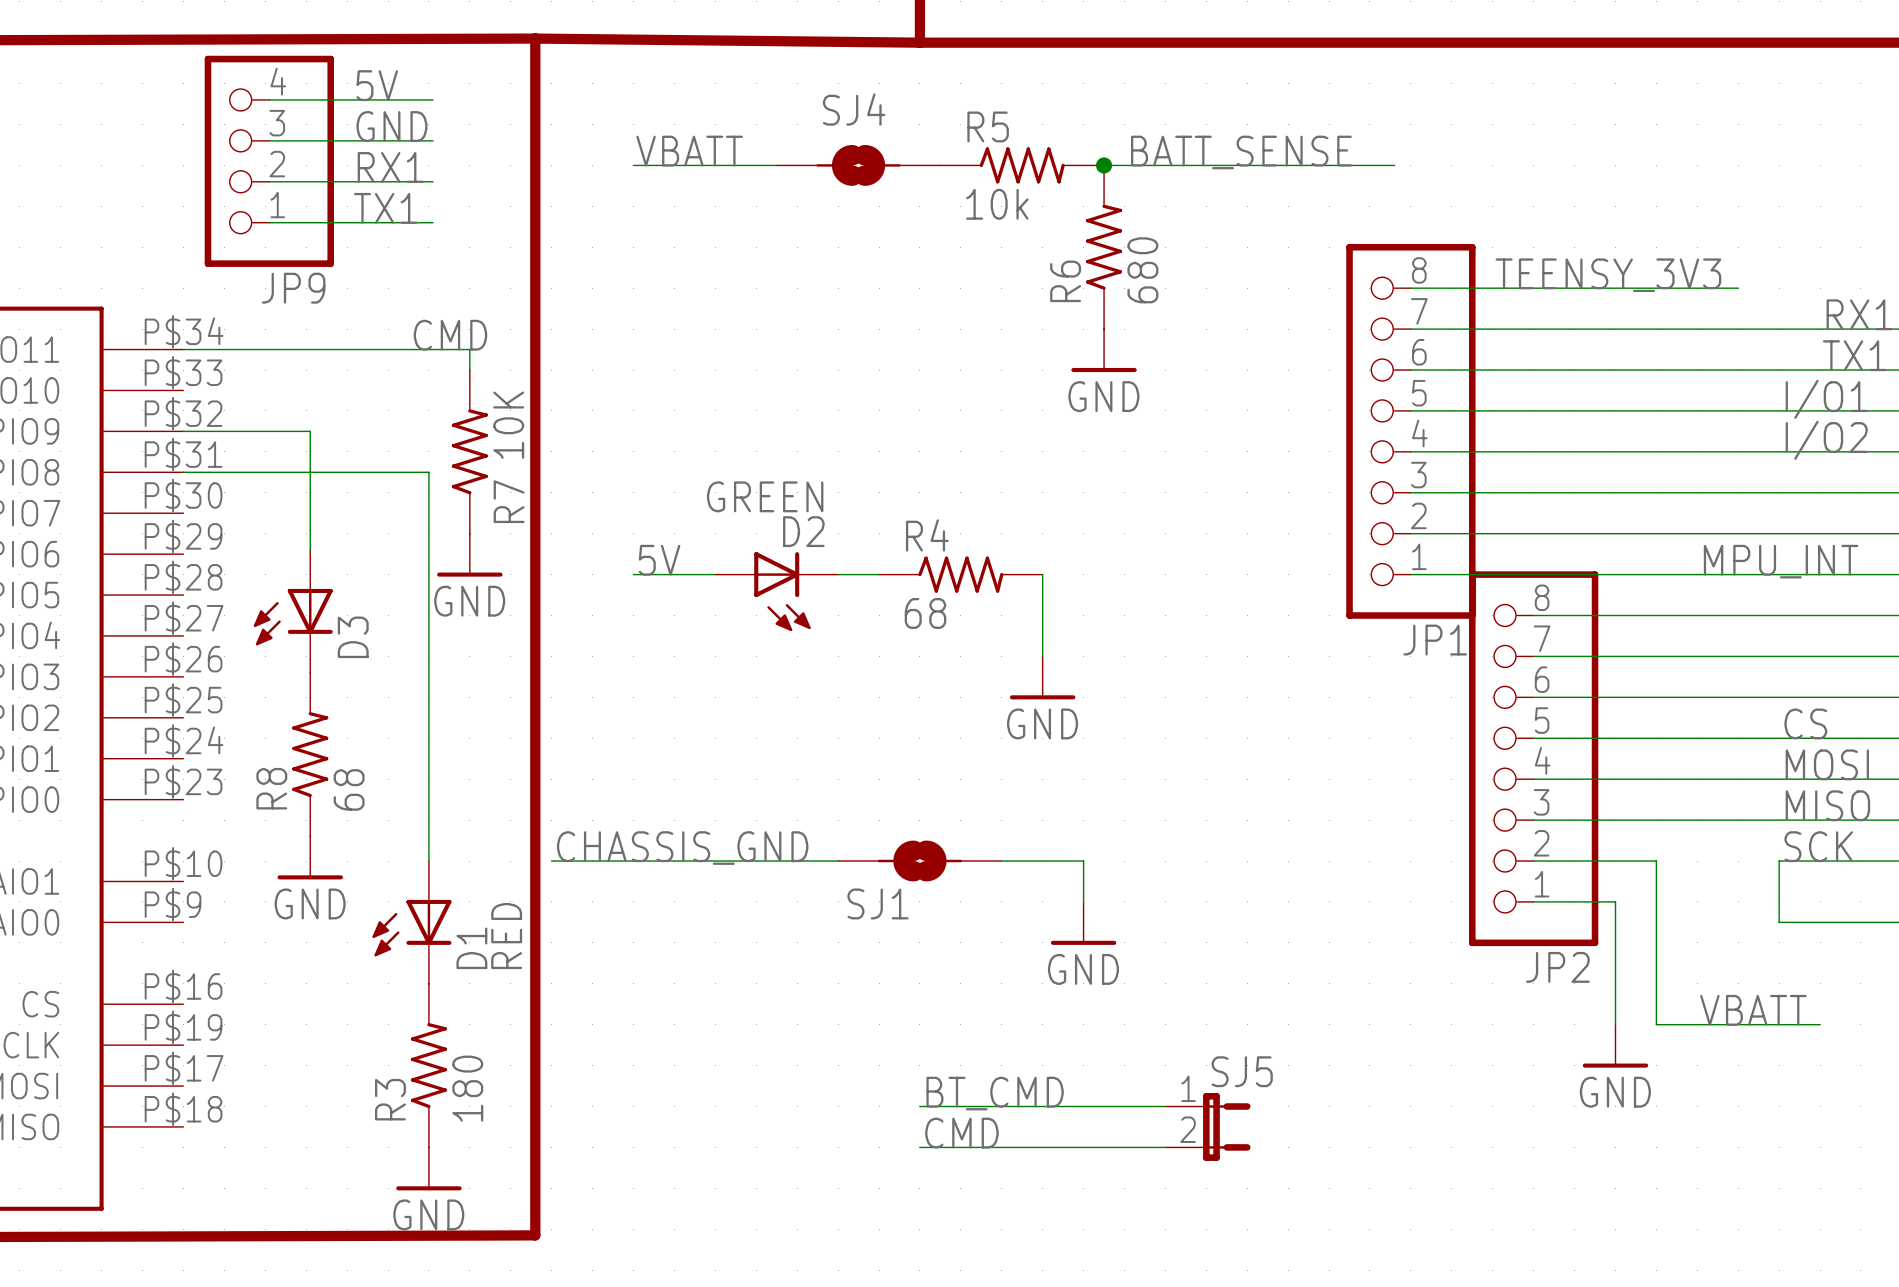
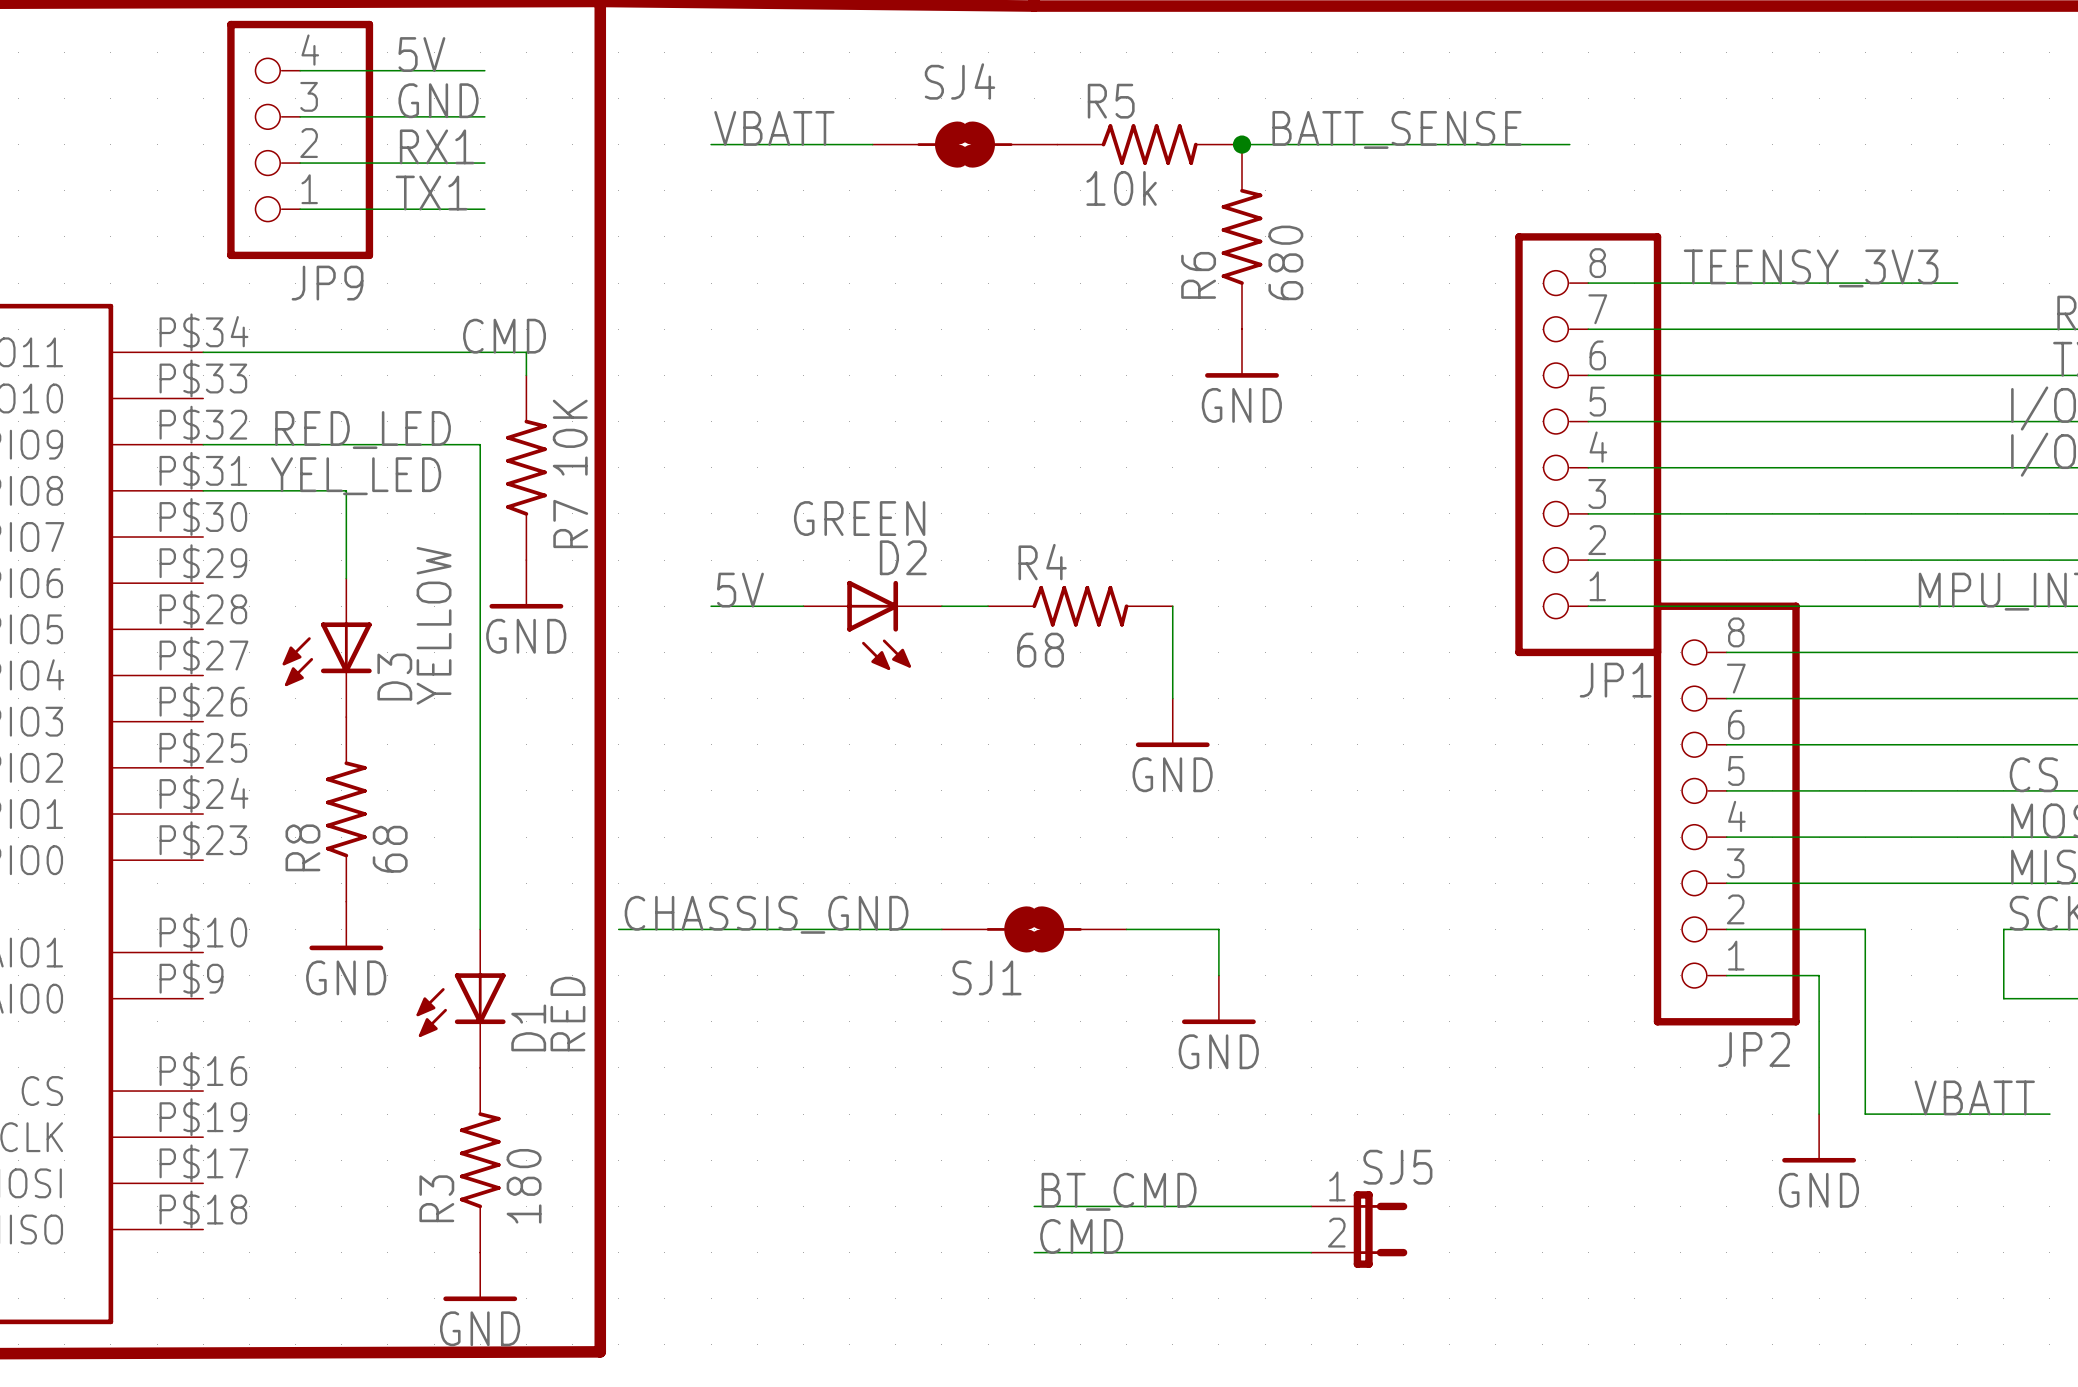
label: none -> RED_LED (363, 430)
wire: (310, 431) (310, 472) (428, 472) -> (346, 444) (480, 444) (480, 490)
label: none -> YEL_LED (356, 476)
D3 value: none -> YELLOW (434, 625)

